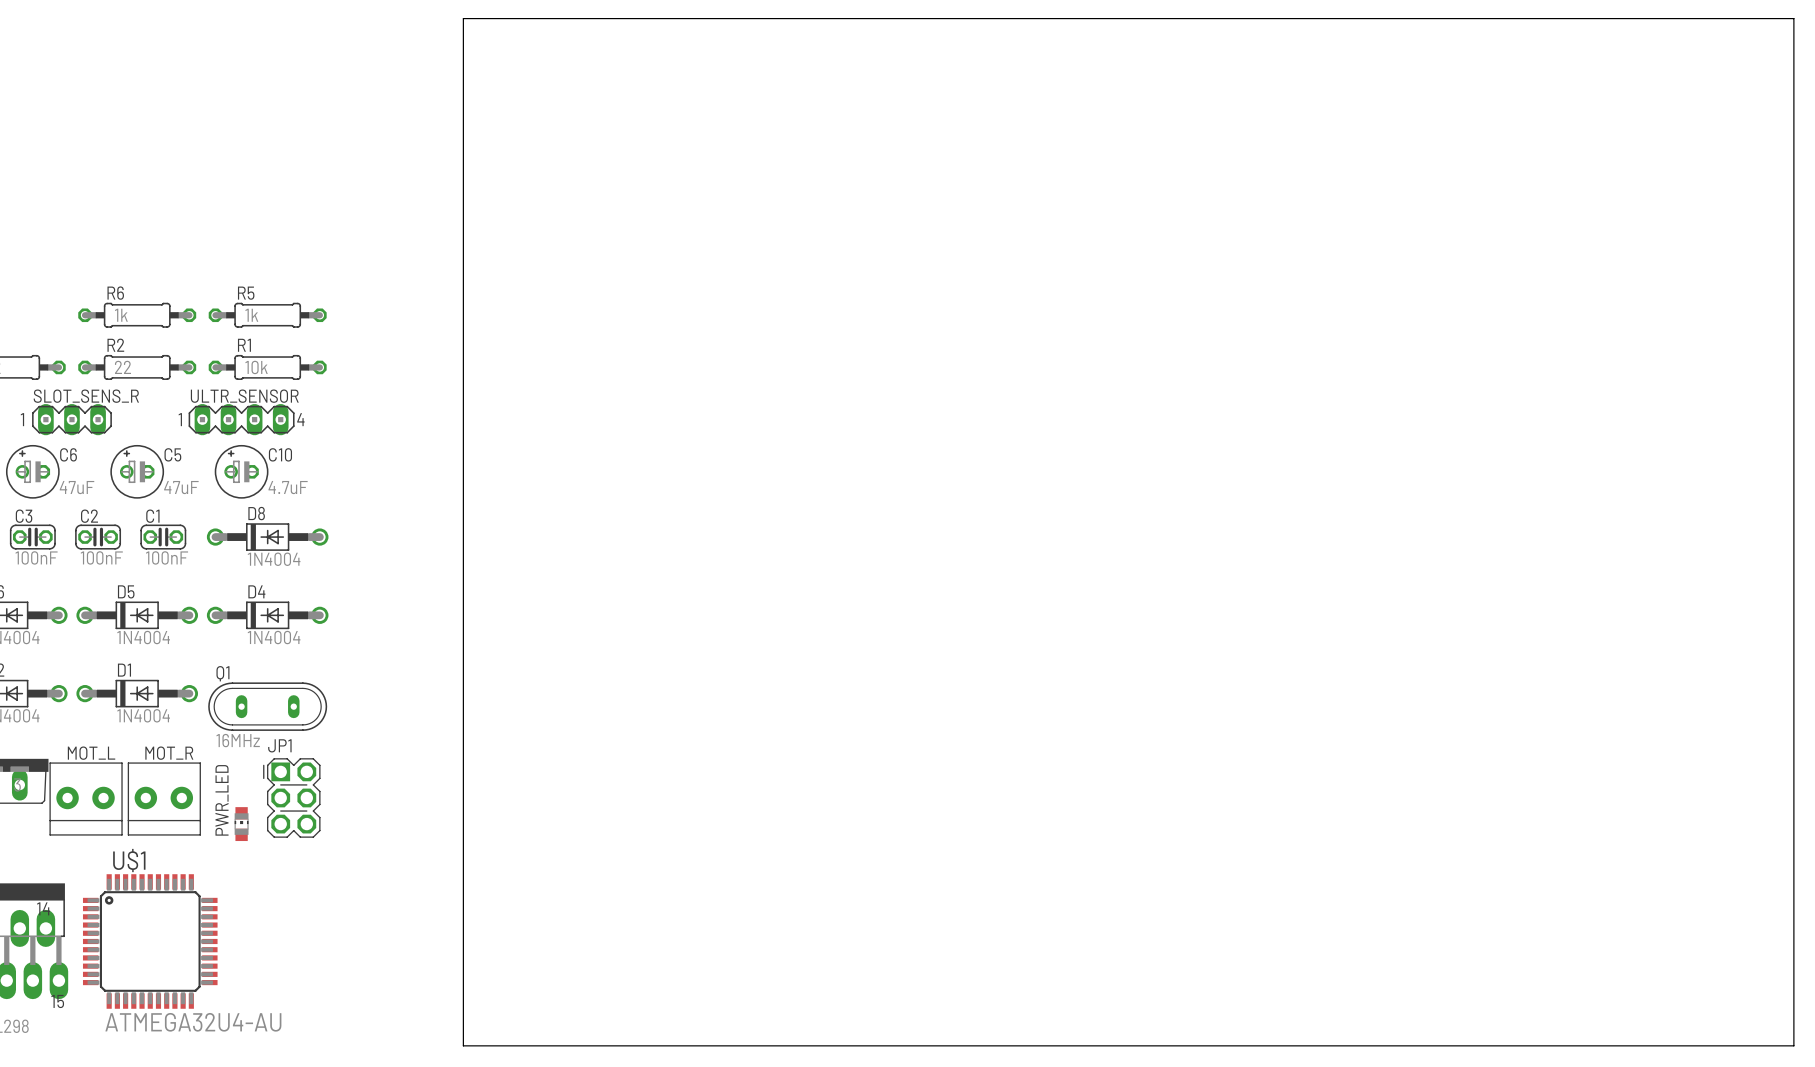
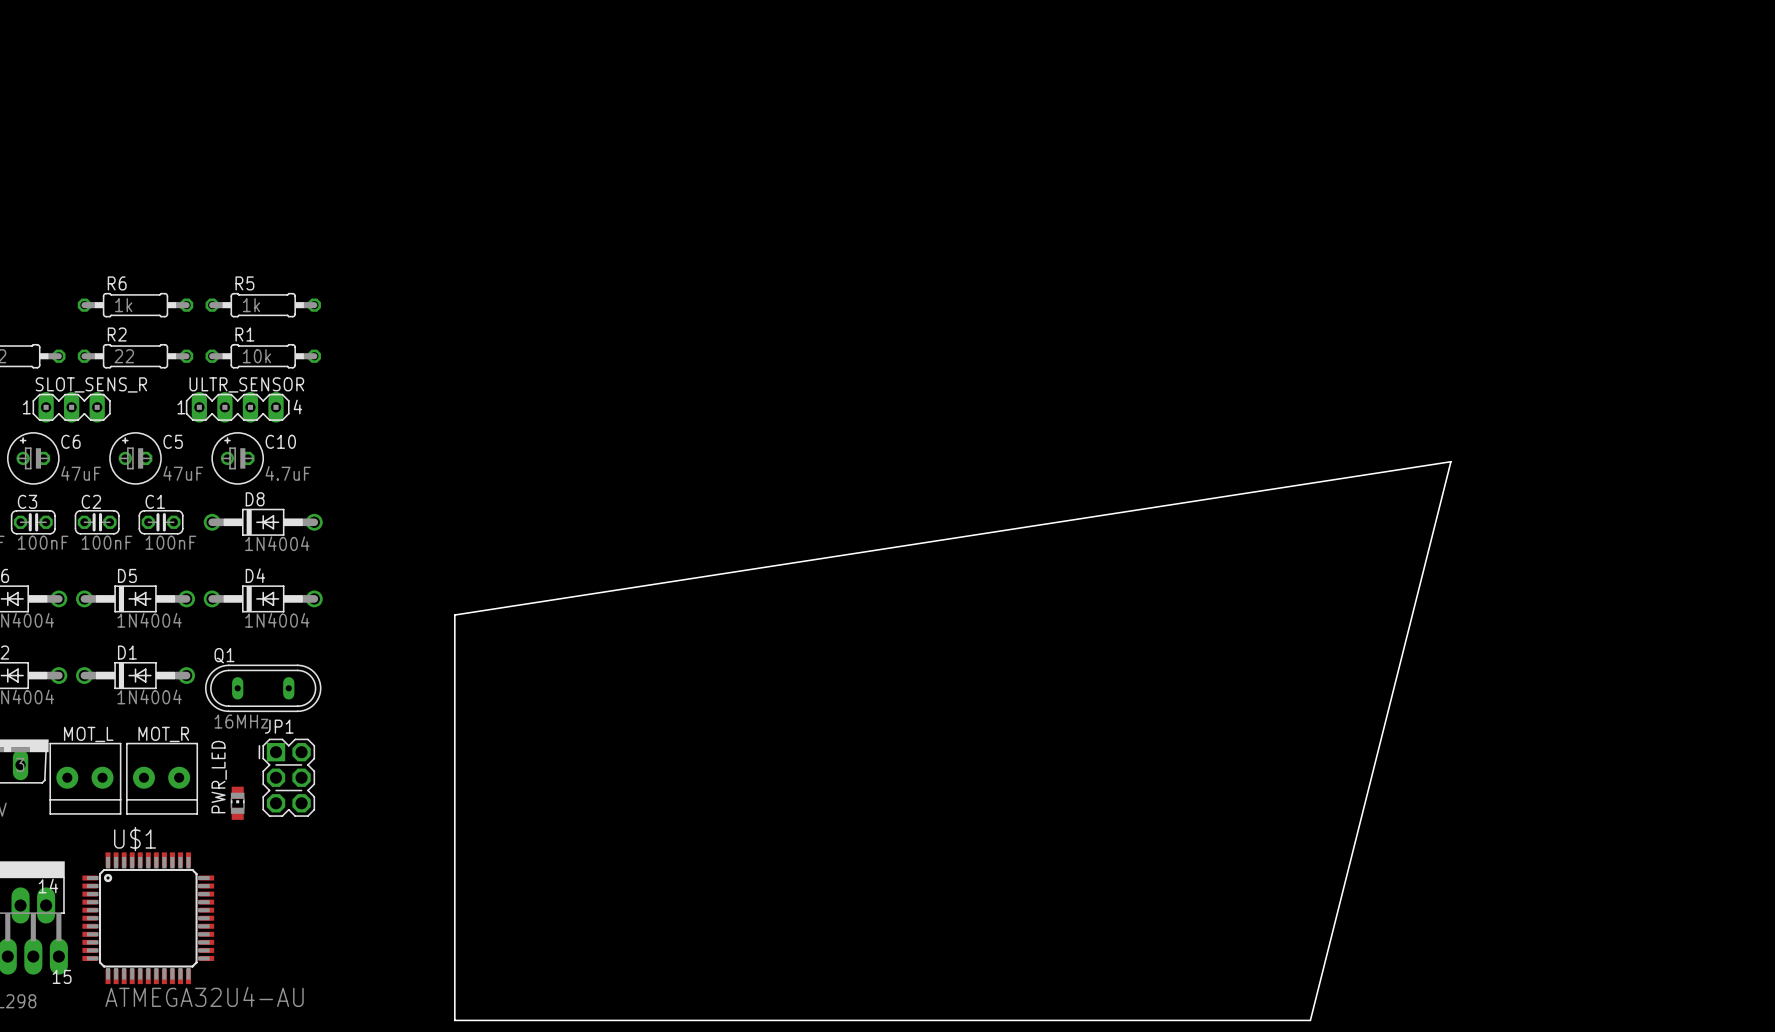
board edge: (463, 631) (463, 18) (1793, 18) (1793, 1045) (1337, 1045) -> (454, 615) (1450, 461) (1310, 1020)

